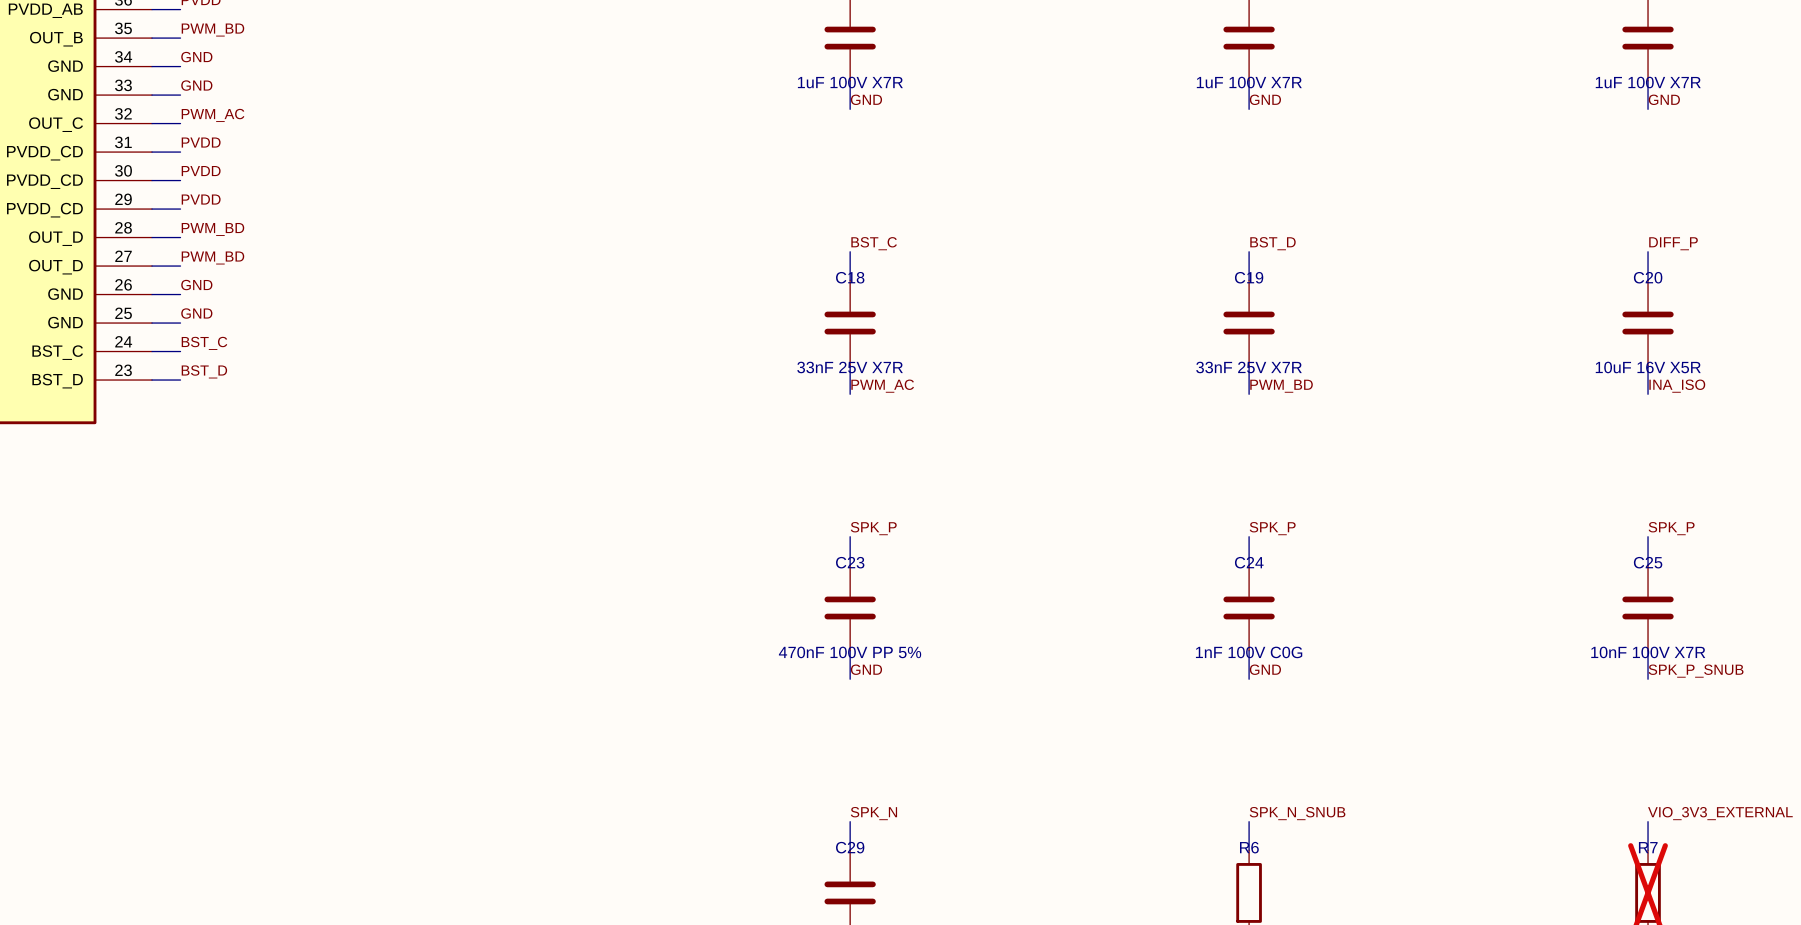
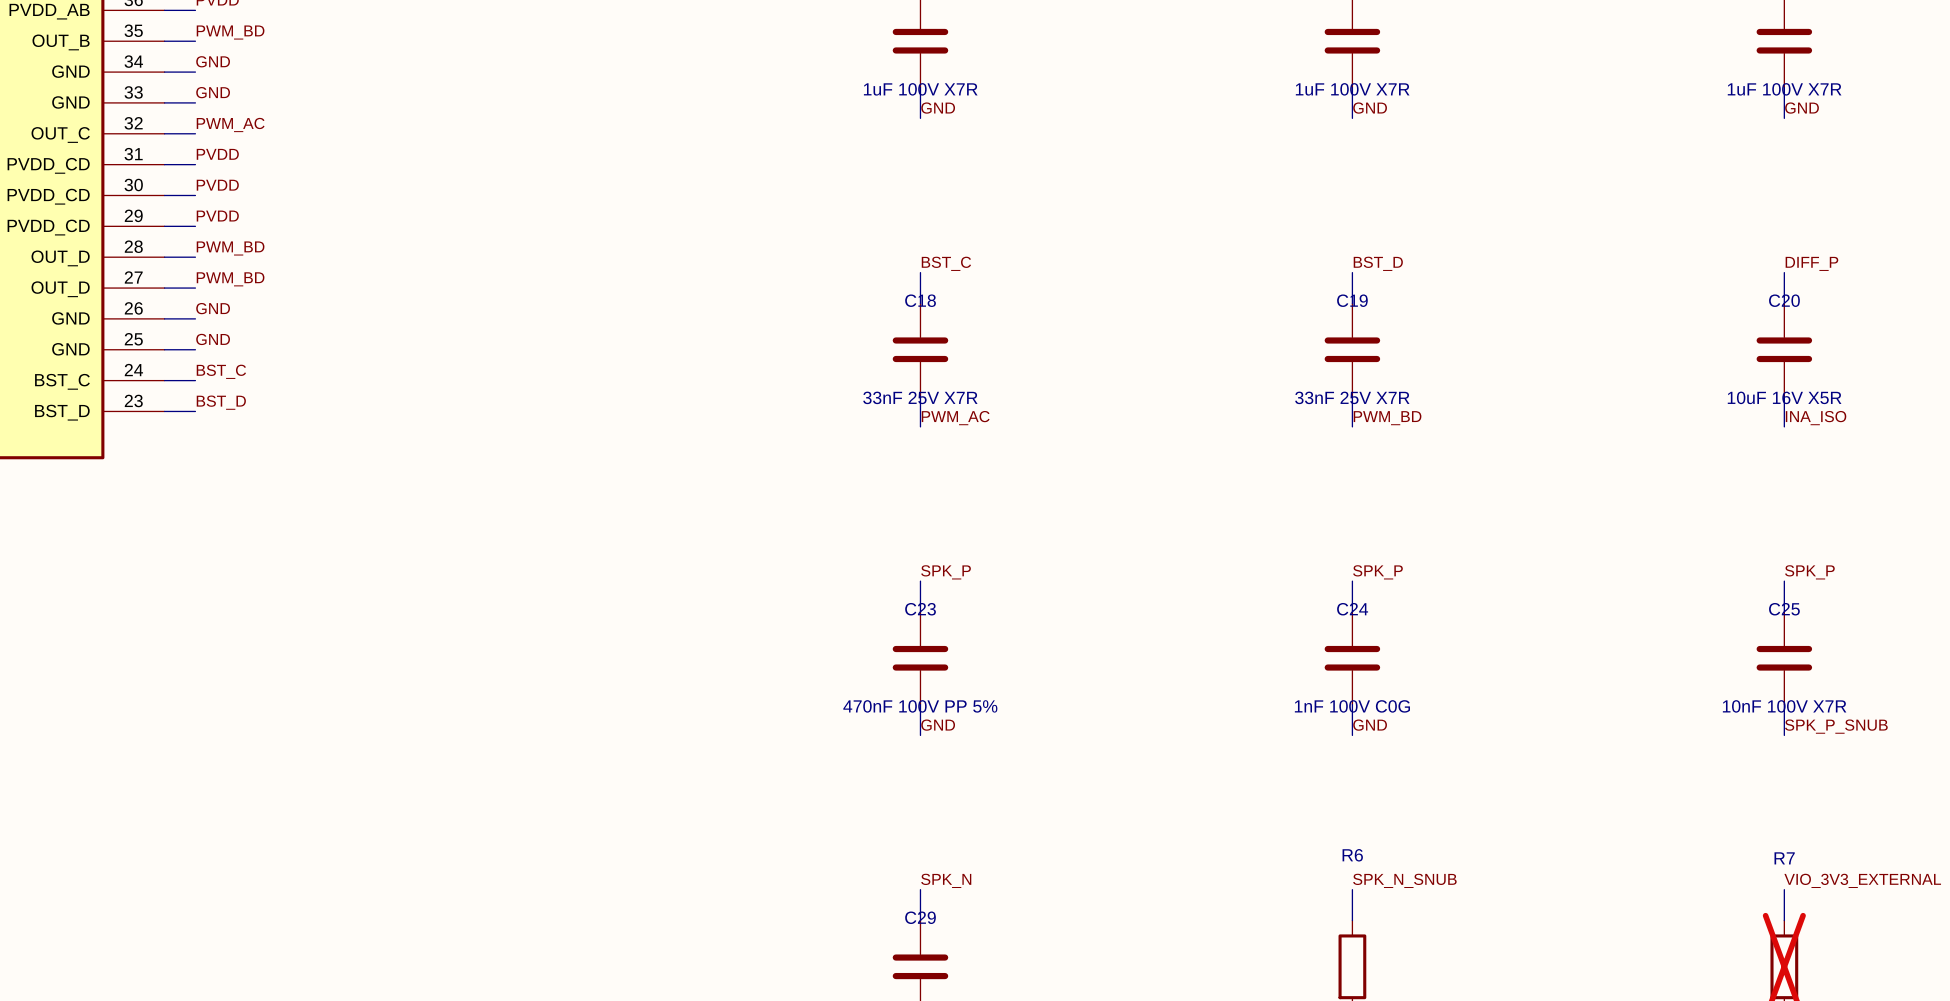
R6 name position: R6 (1249, 847) -> R6 (1352, 855)
R7 name position: R7 (1648, 847) -> R7 (1784, 858)

